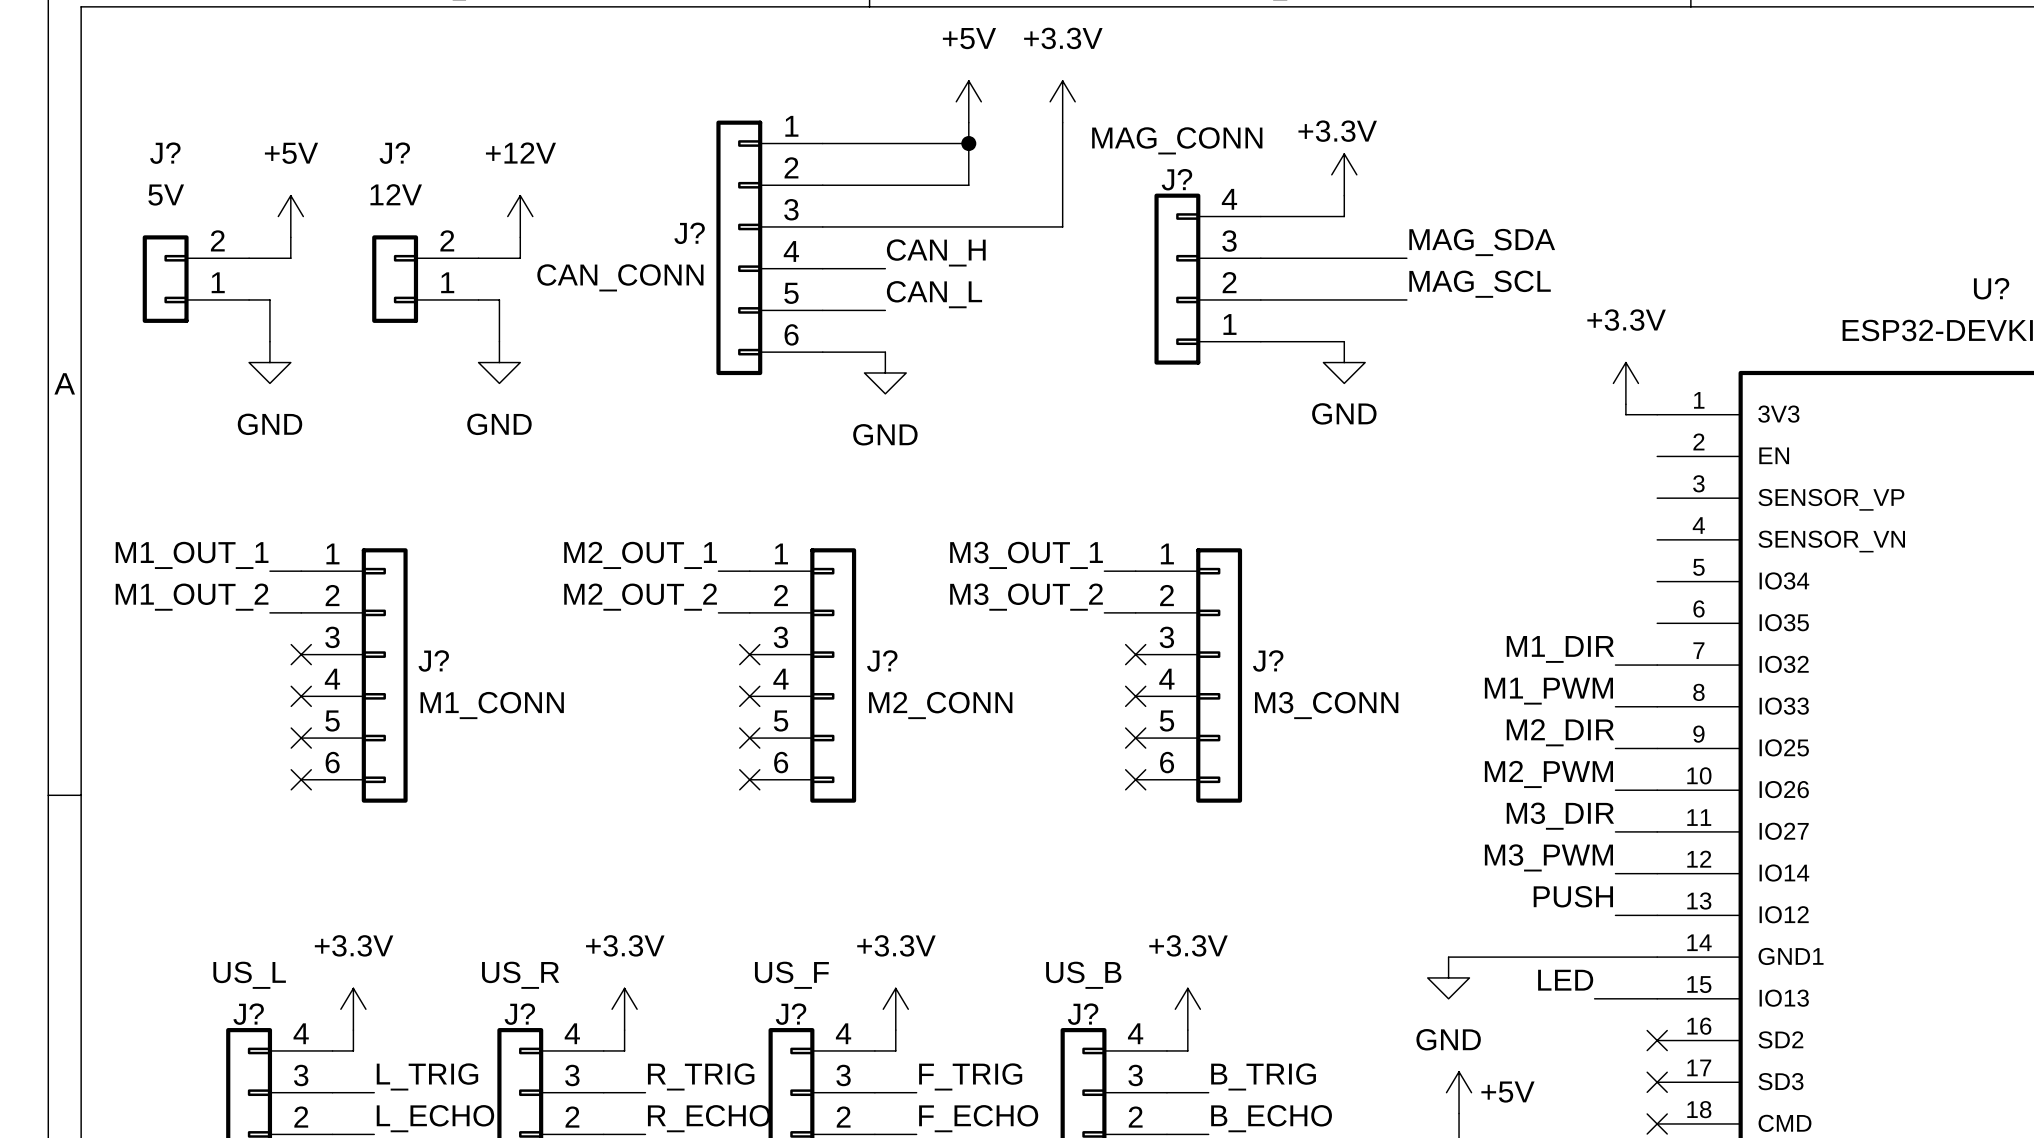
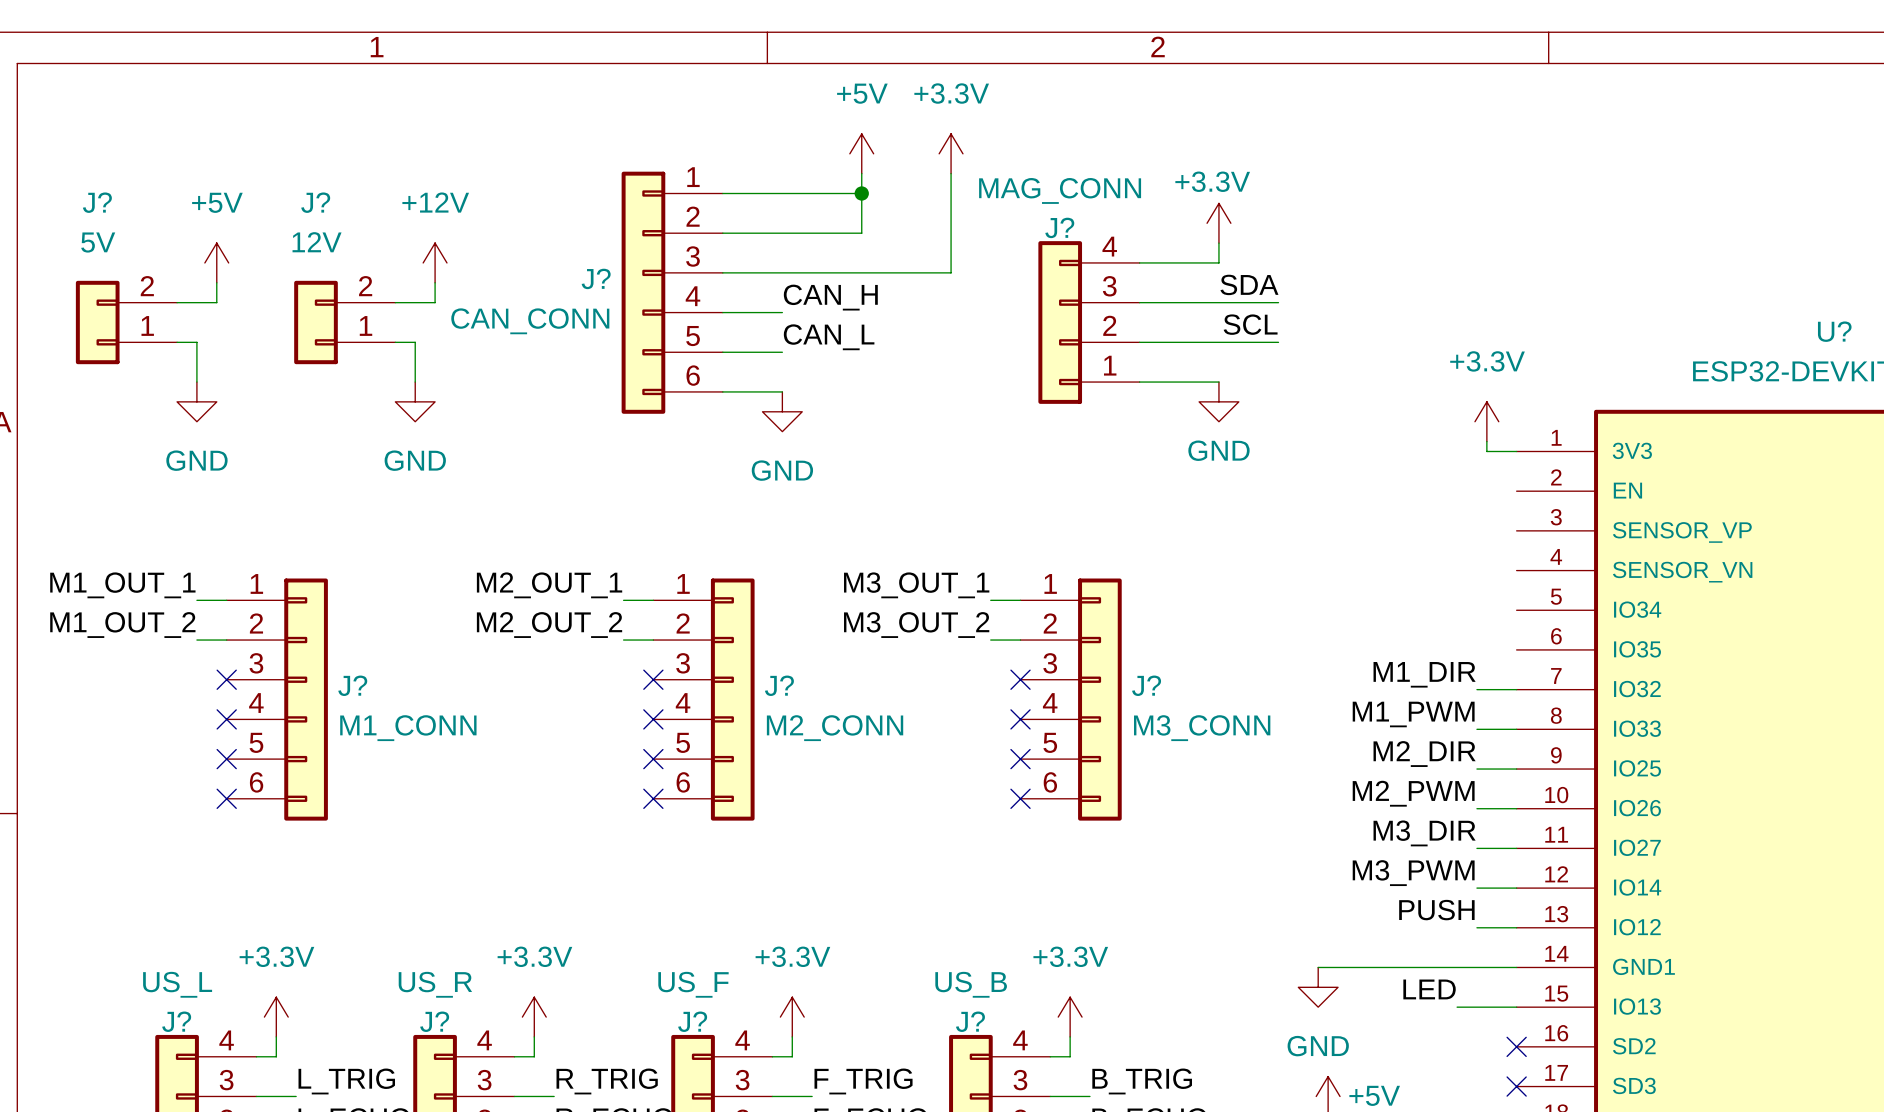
label: MAG_SDA (1482, 242) -> SDA (1249, 284)
label: MAG_SCL (1480, 284) -> SCL (1250, 324)

